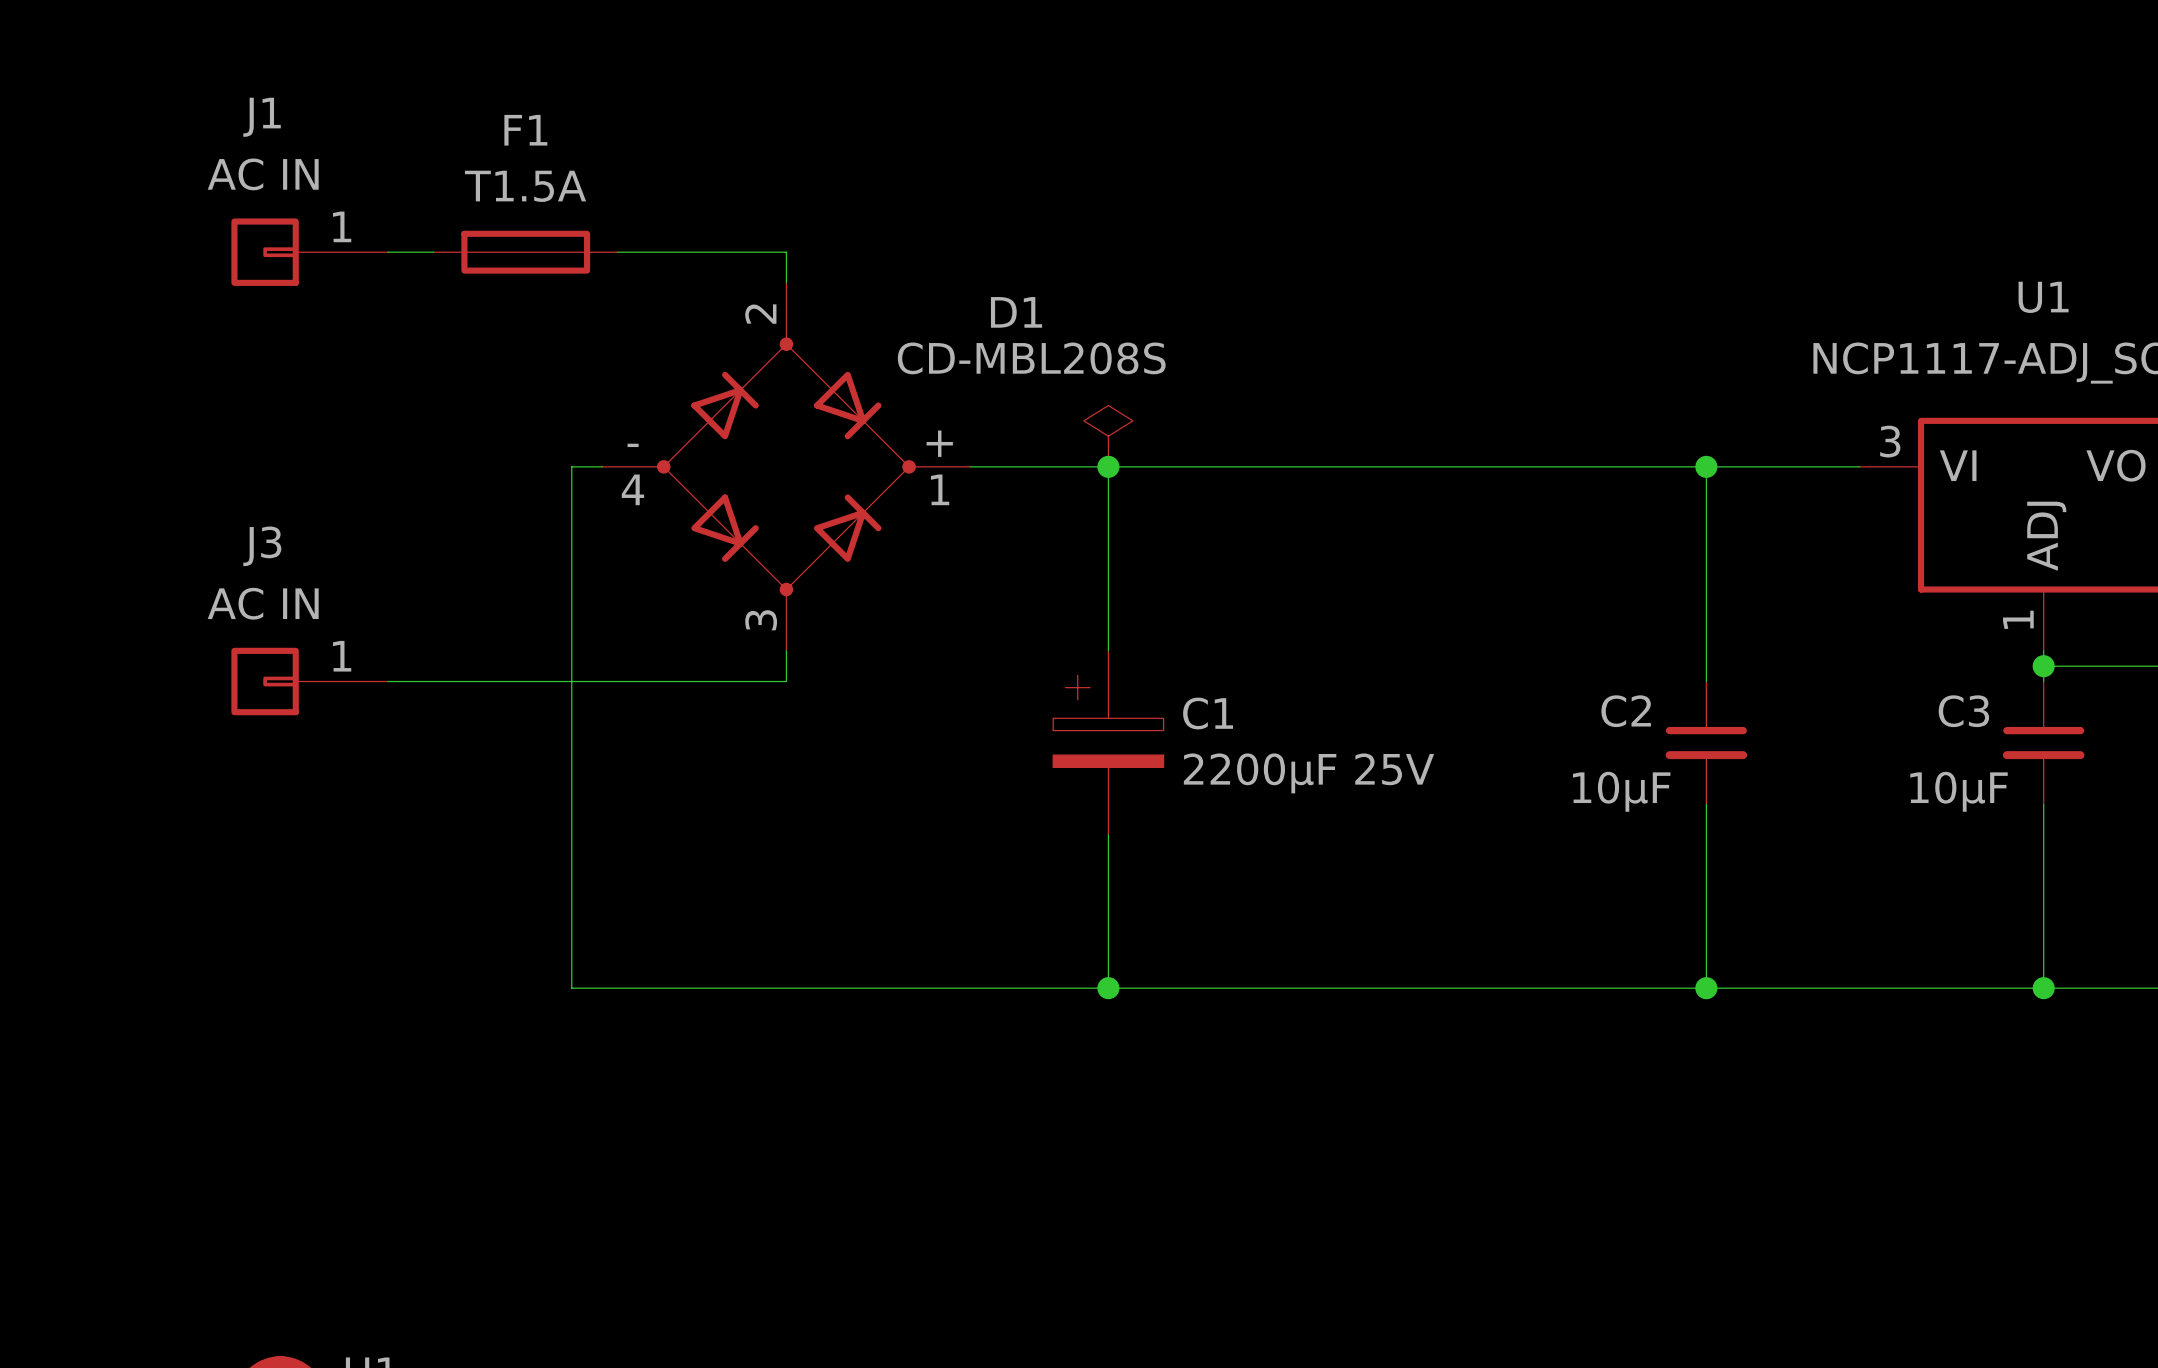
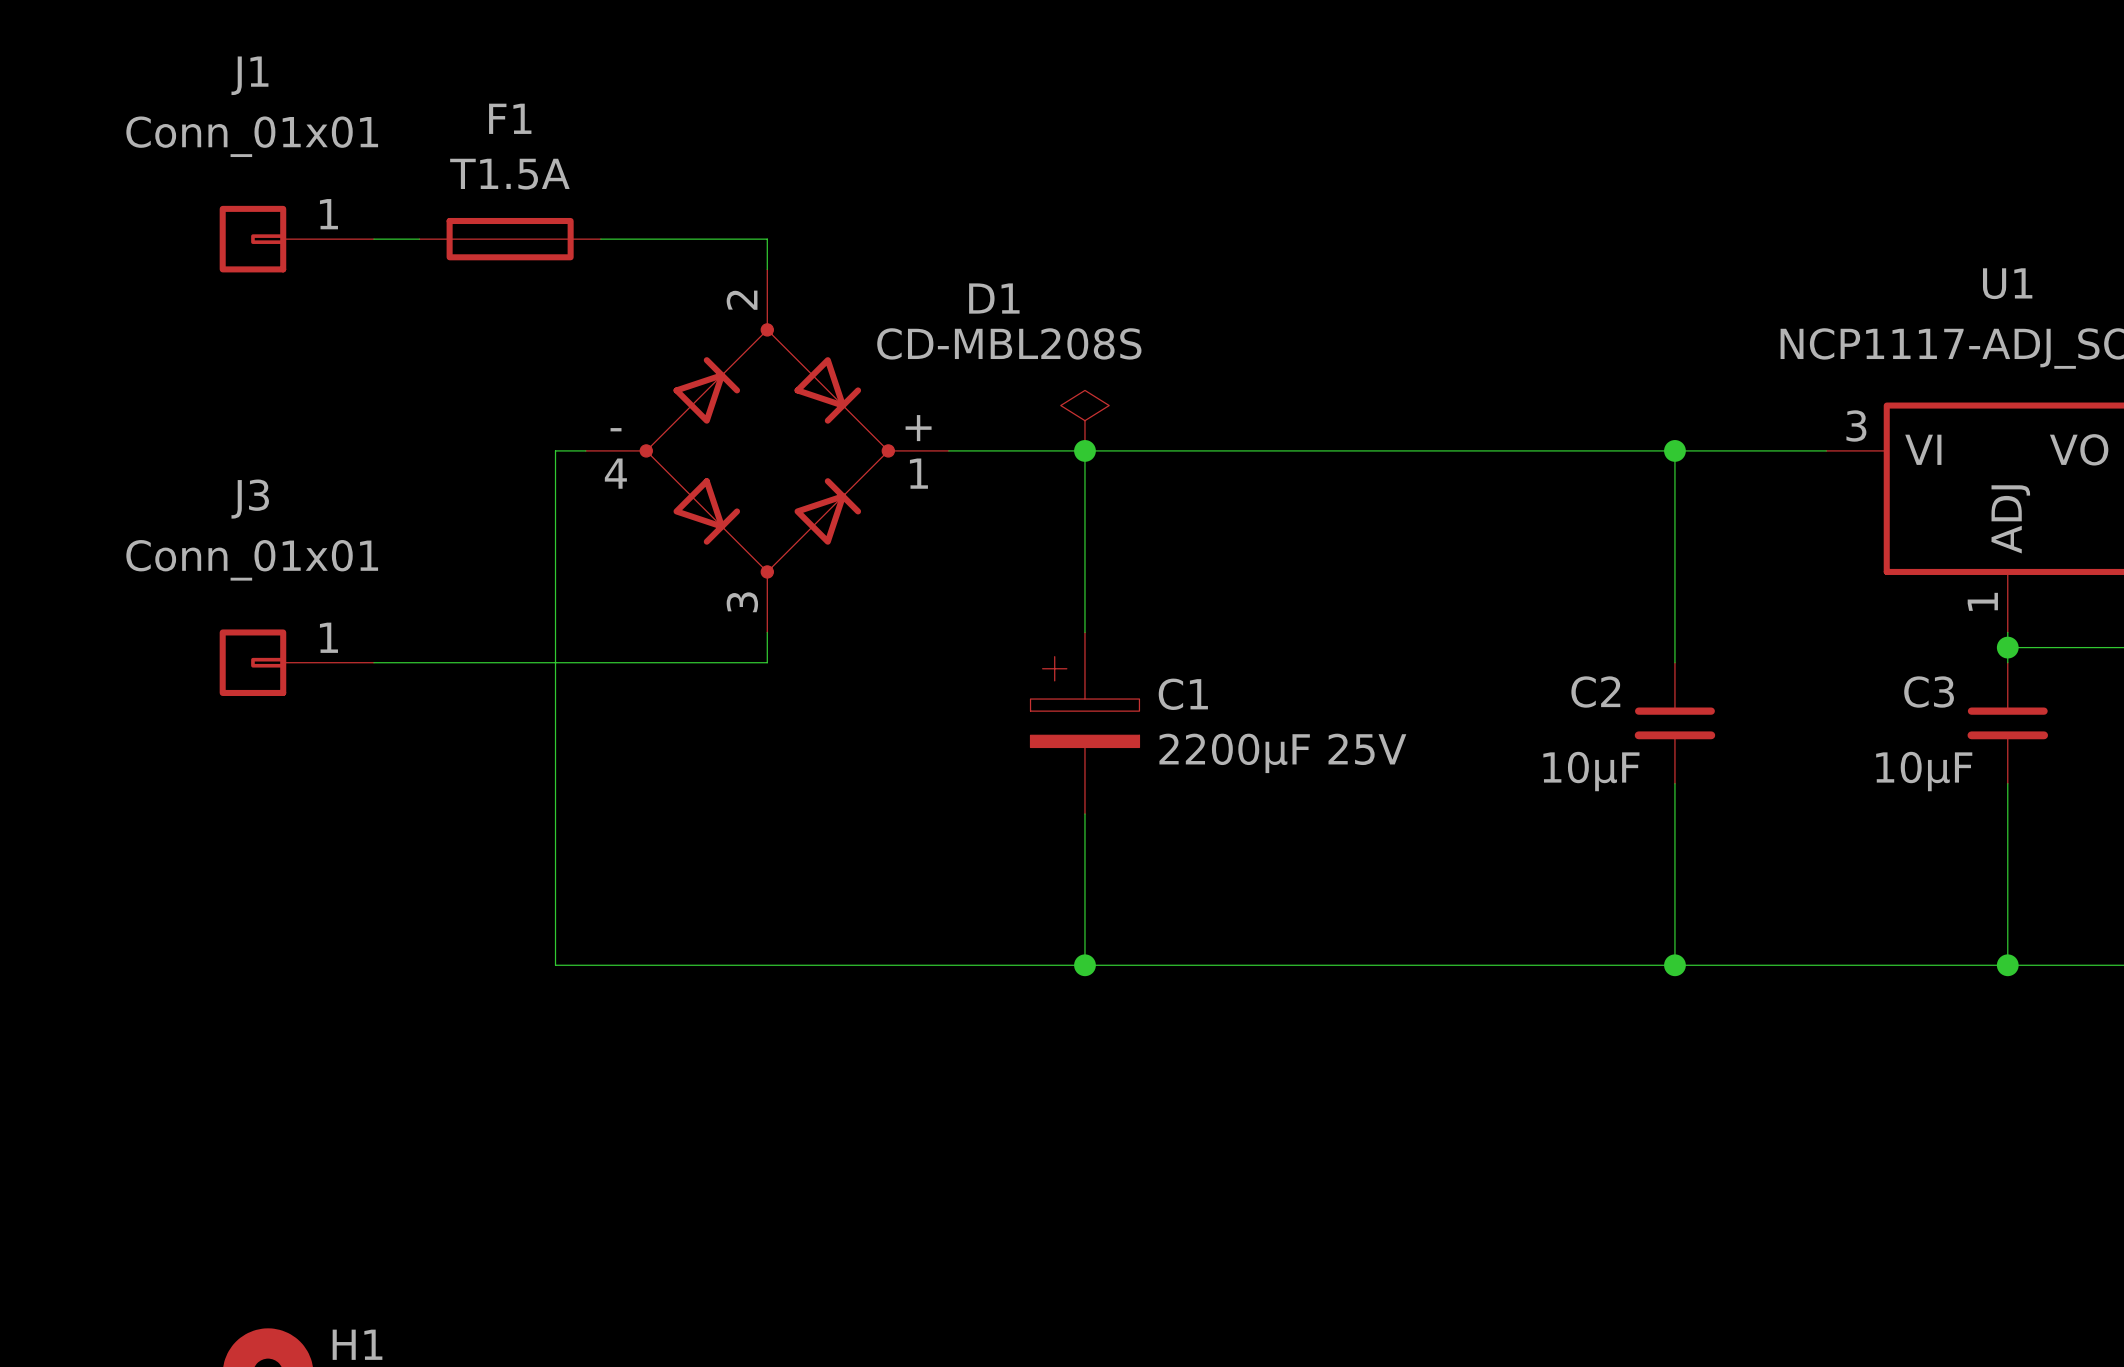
J1 name position: J1 (262, 117) -> J1 (249, 75)
J1 value: AC IN (263, 174) -> Conn_01x01 (252, 136)
J3 name position: J3 (262, 546) -> J3 (250, 499)
J3 value: AC IN (263, 603) -> Conn_01x01 (252, 560)

